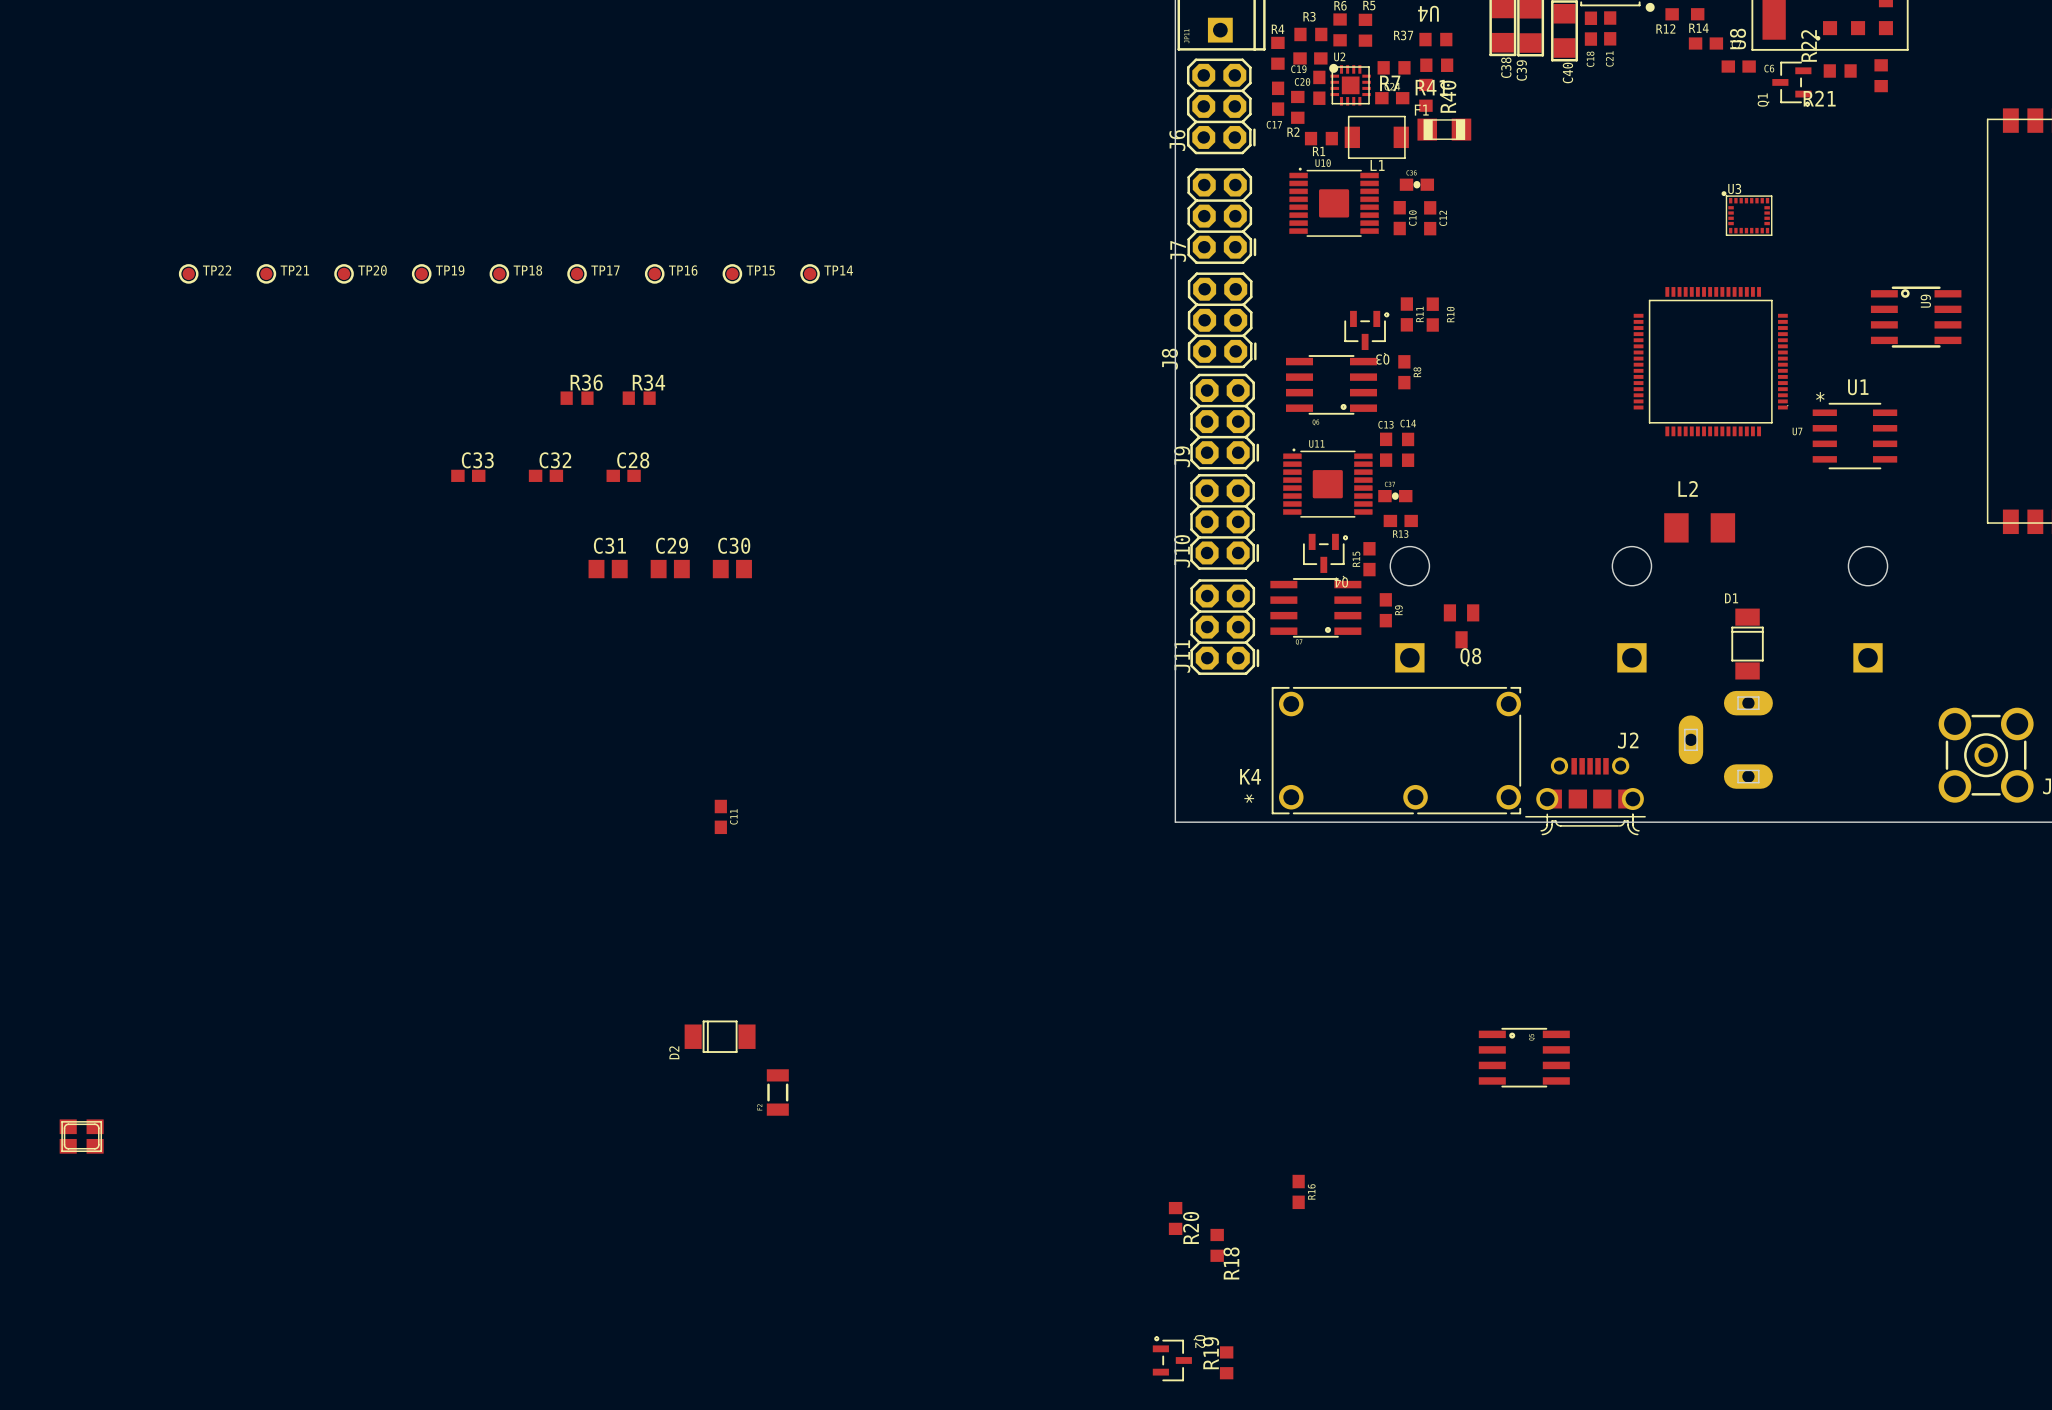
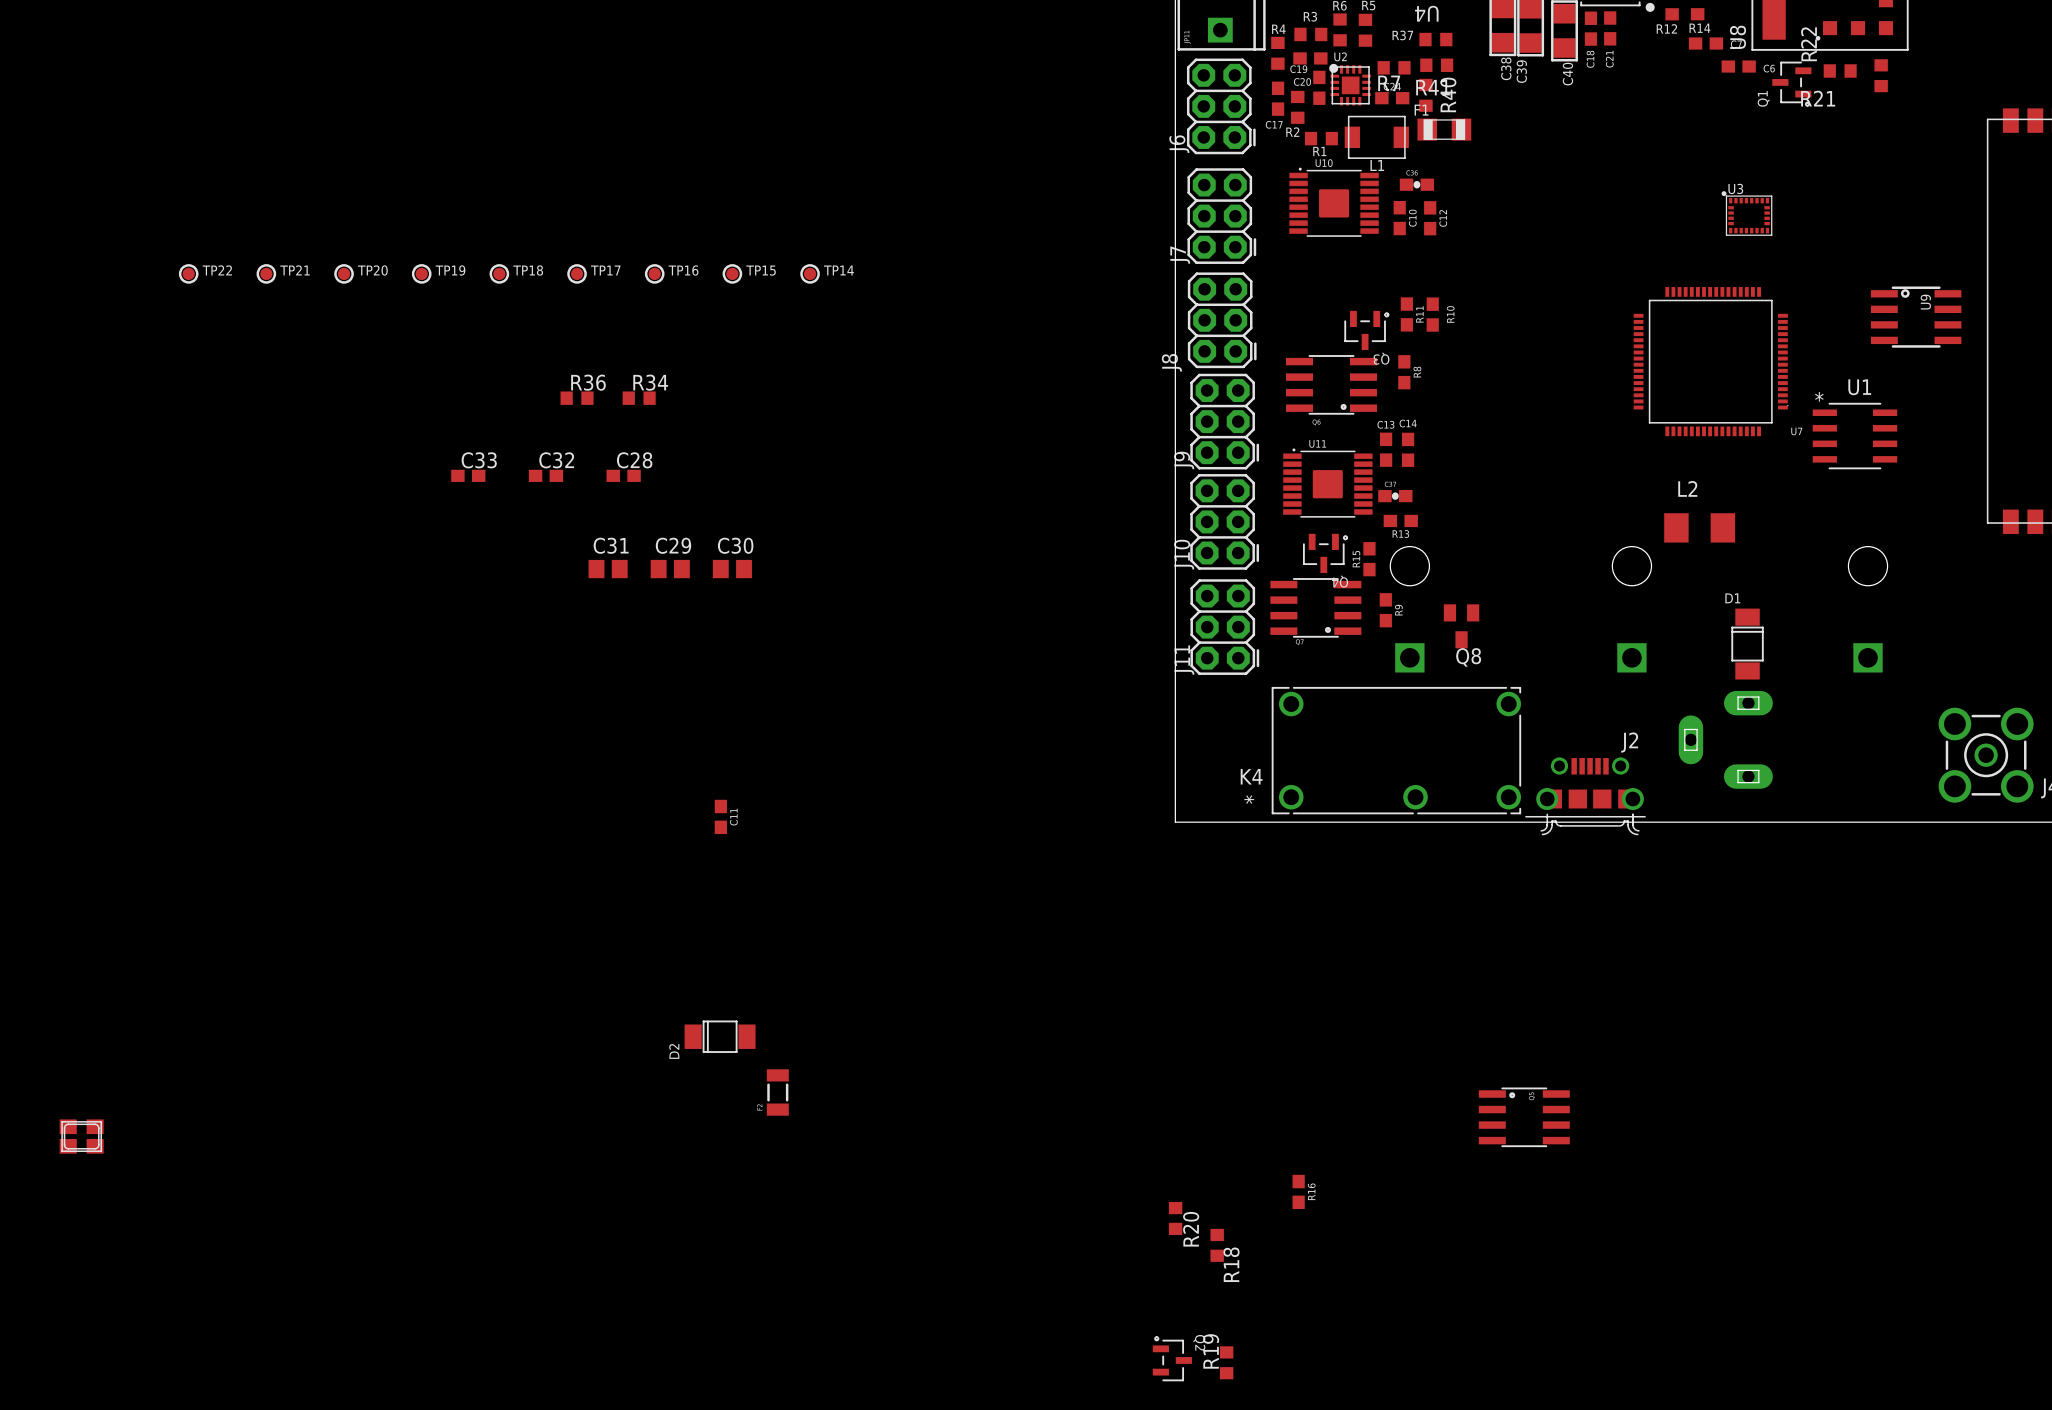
part position: (1524, 1057) -> (1524, 1117)

